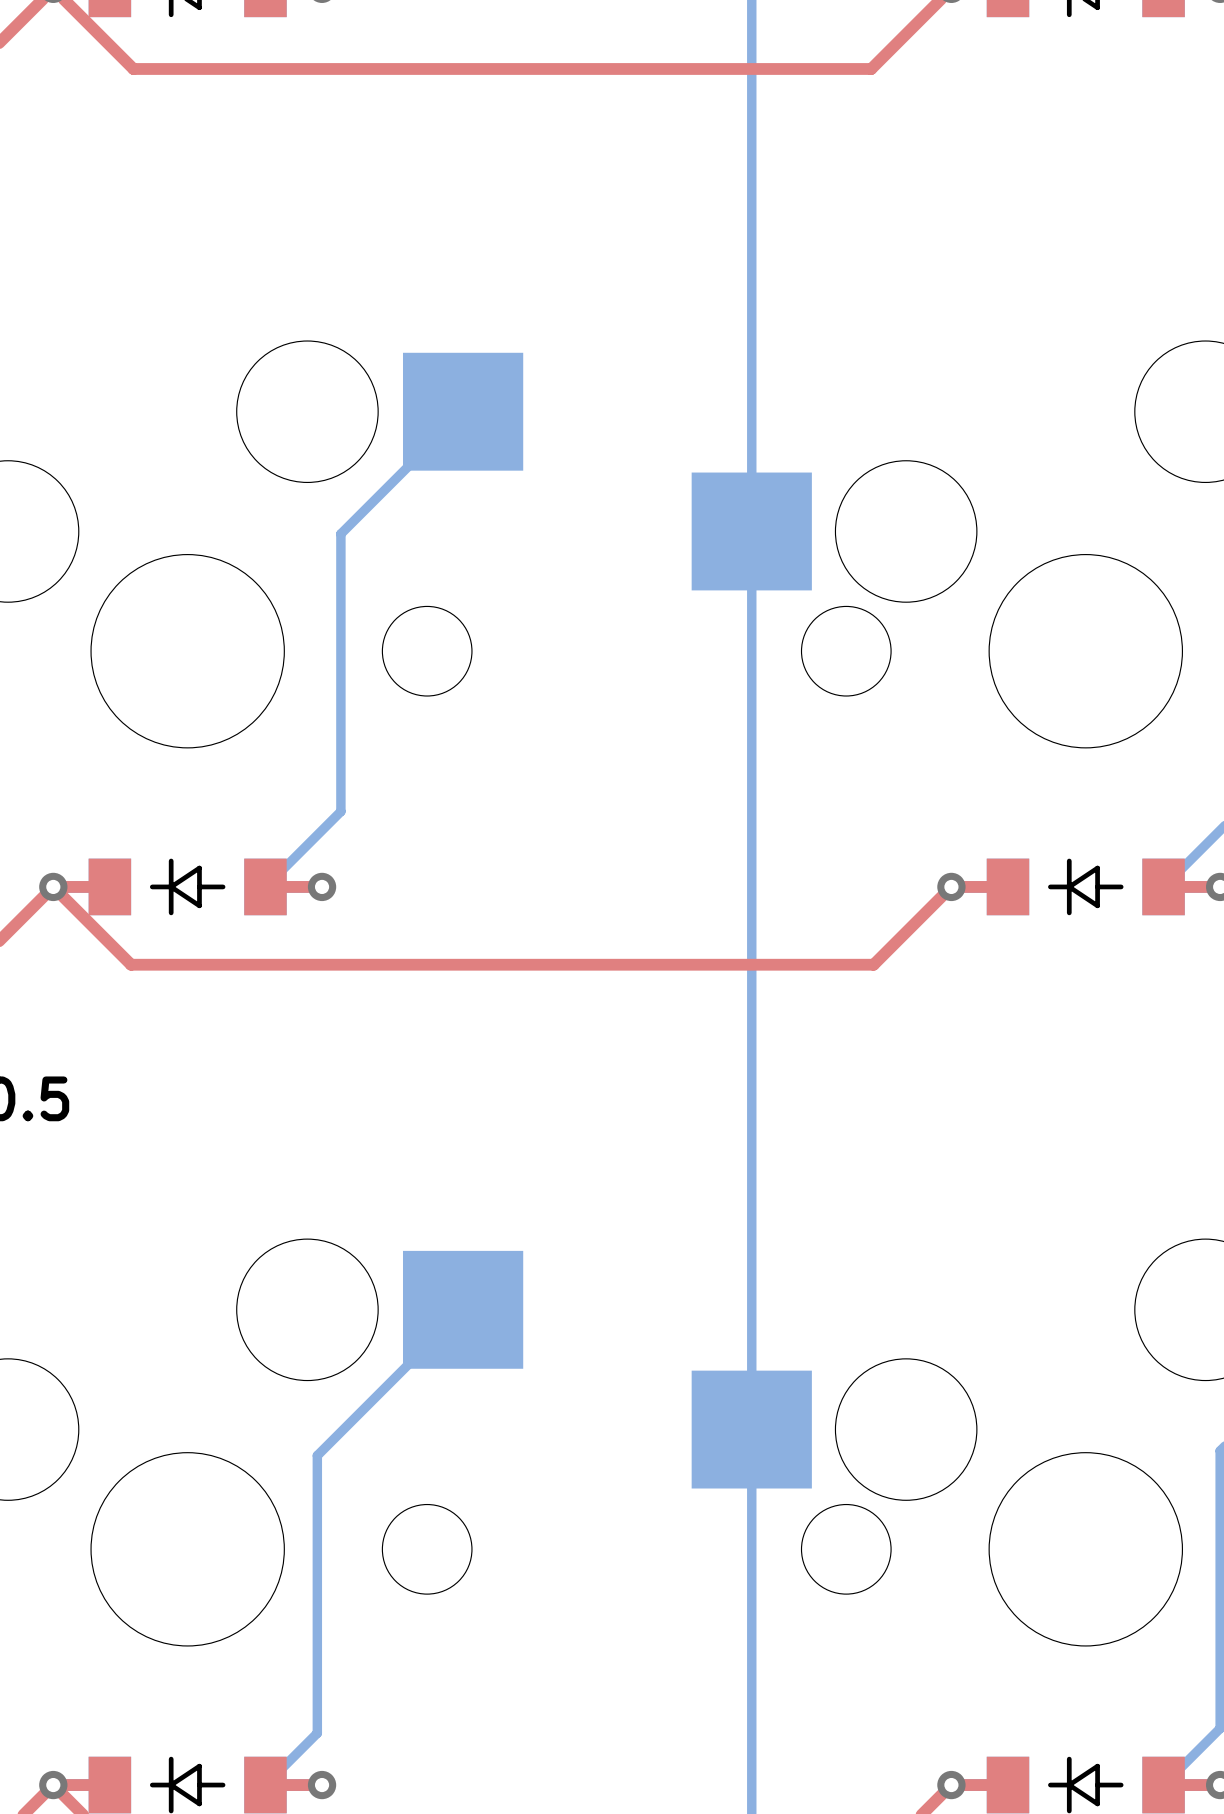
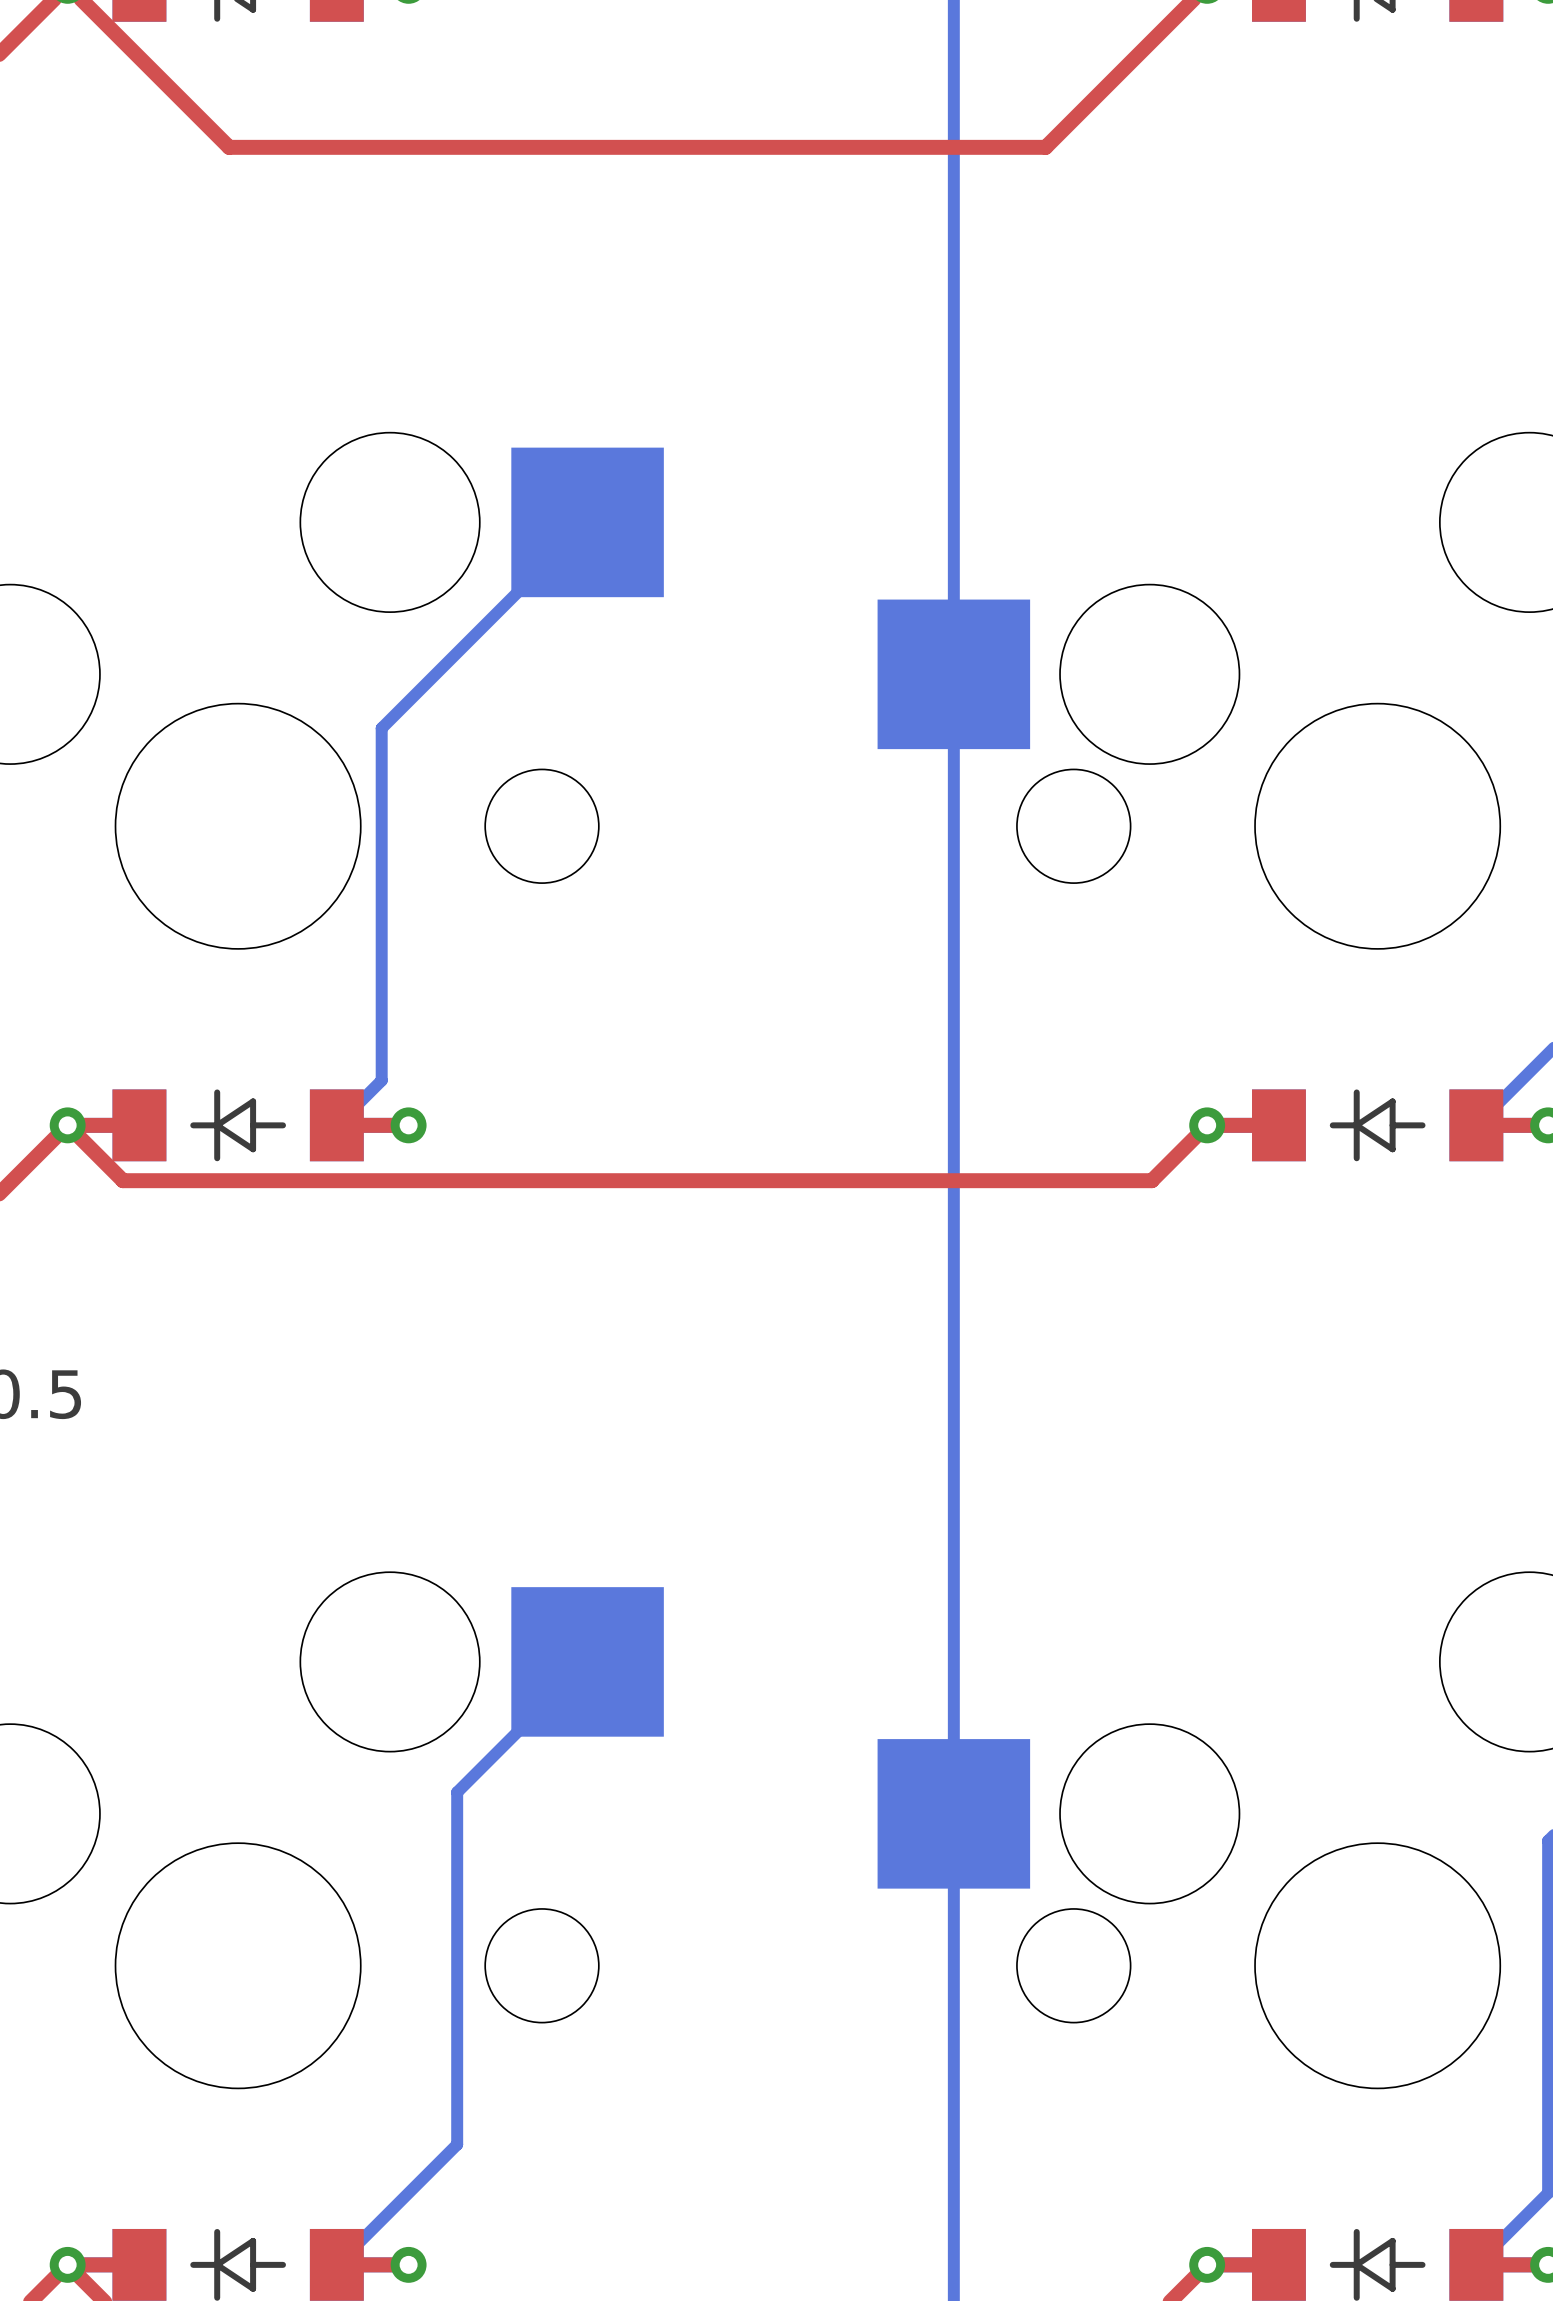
top track: (133, 68) (871, 68) -> (169, 87) (229, 147) (1045, 147) (1105, 87)
bottom track: (340, 533) (340, 811) (300, 851) -> (432, 677) (381, 728) (381, 1080)
top track: (96, 930) (131, 964) (873, 964) (907, 930) -> (122, 1180) (1151, 1180)
bottom track: (360, 1412) (317, 1455) (317, 1733) -> (457, 1792) (457, 2144) (402, 2199)

